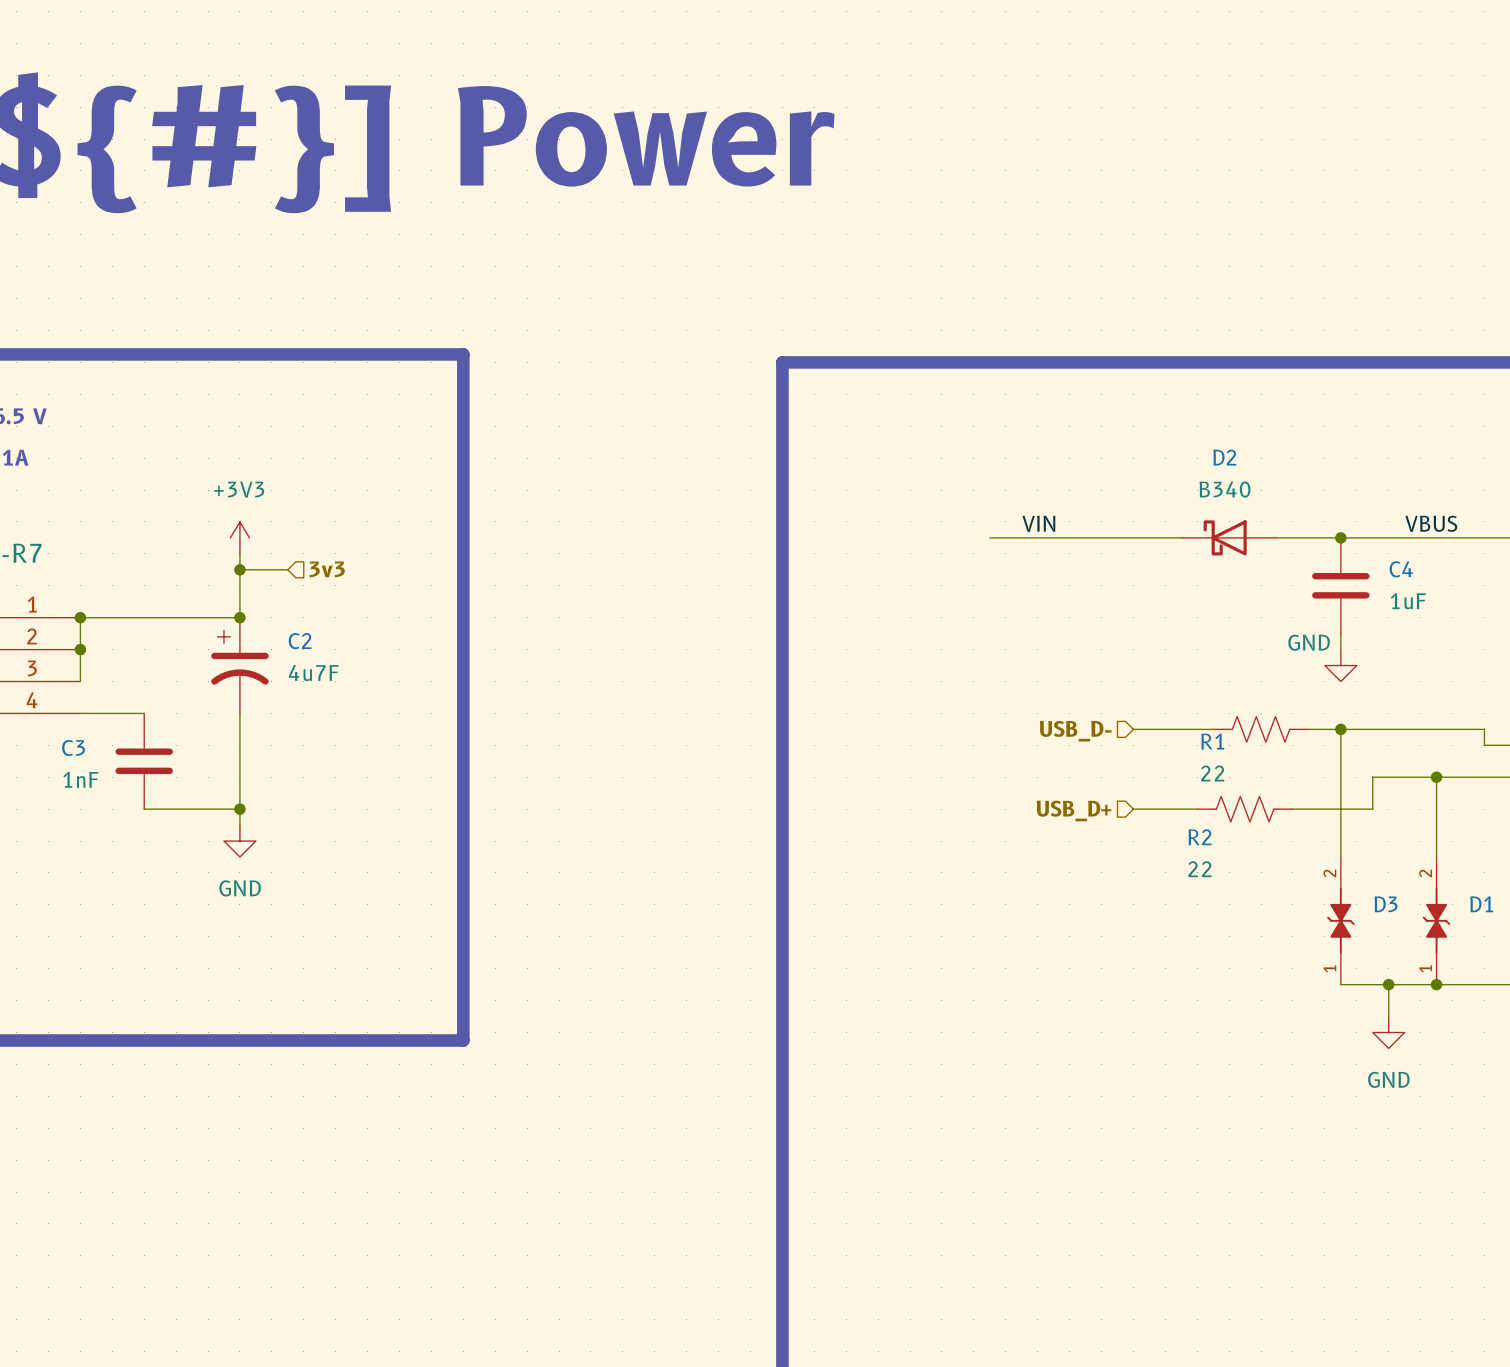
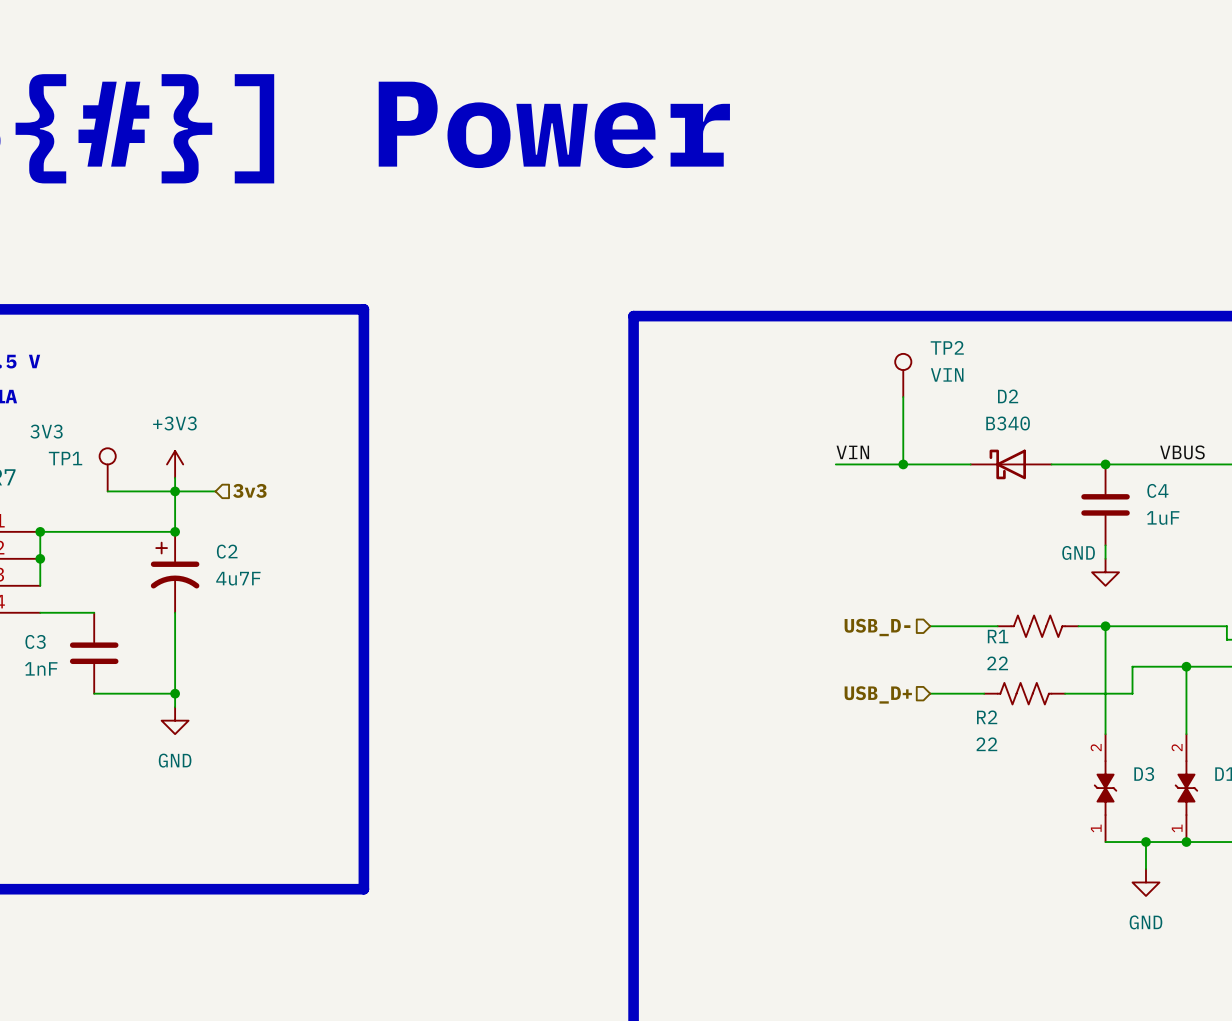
TP2: none -> VIN (903, 375)
wire: none -> (903, 397) (903, 464)
wire: (989, 537) (1021, 537) -> none
junction: none -> (903, 464)
TP1: none -> 3V3 (107, 469)
wire: none -> (107, 491) (175, 491)

